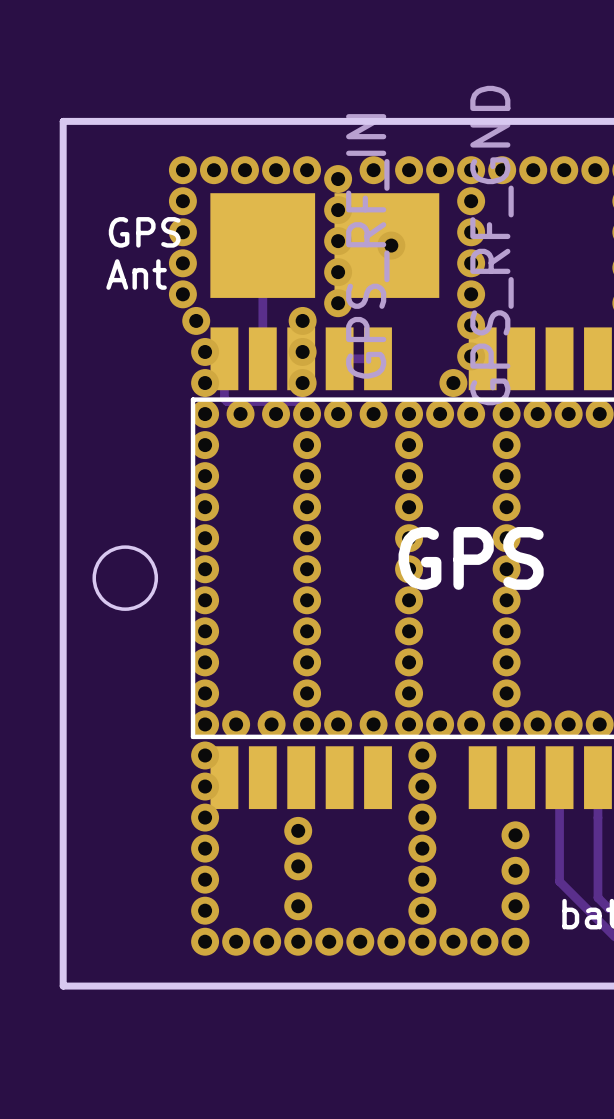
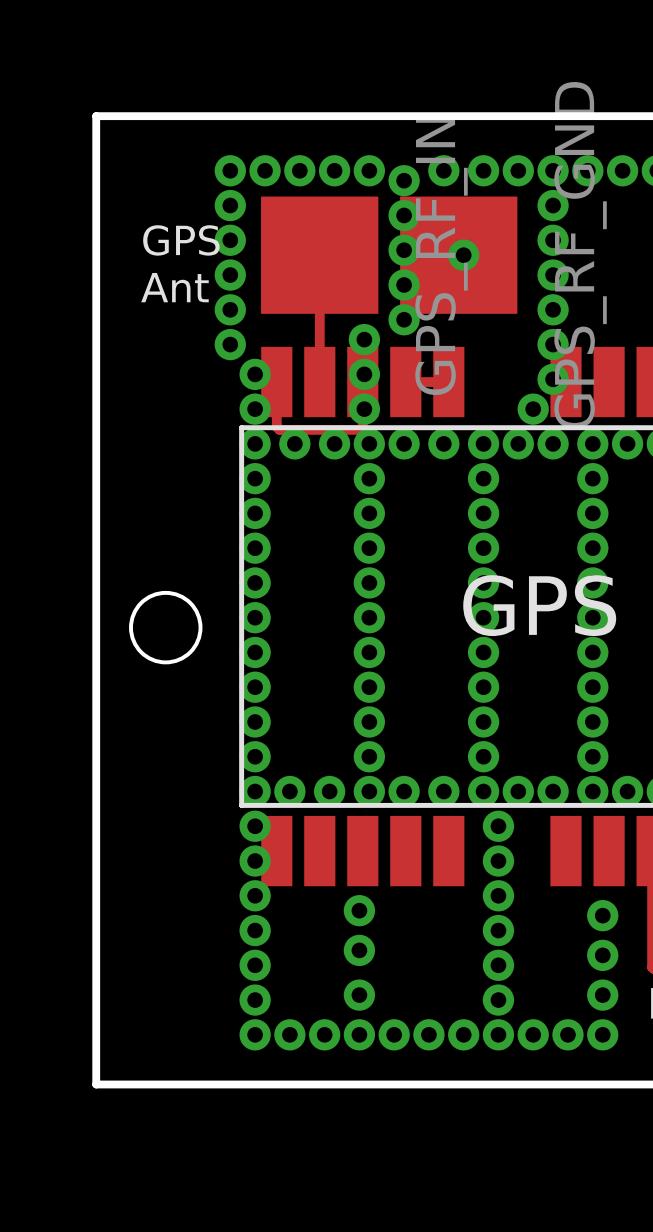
via position: (196, 320) -> (230, 344)

